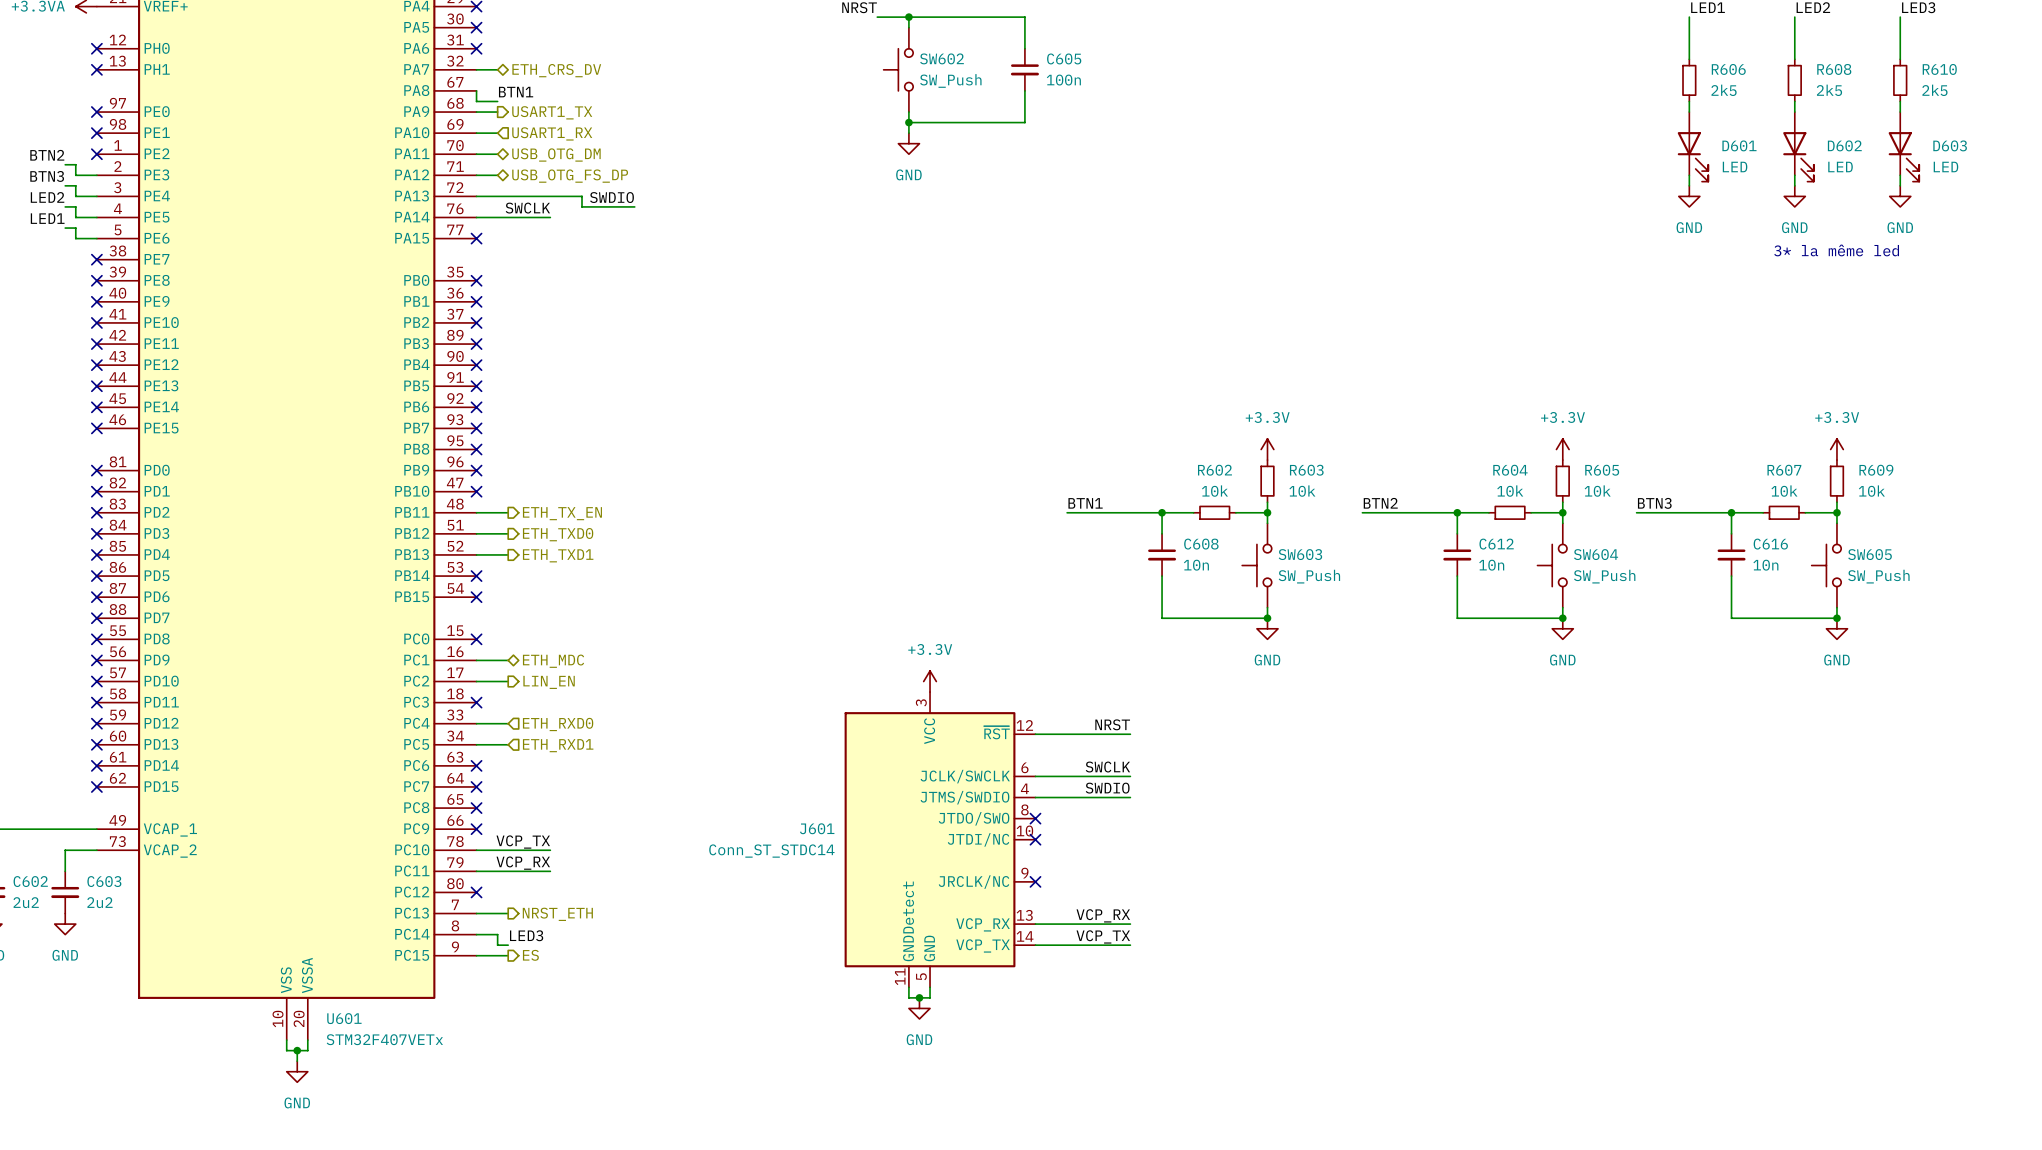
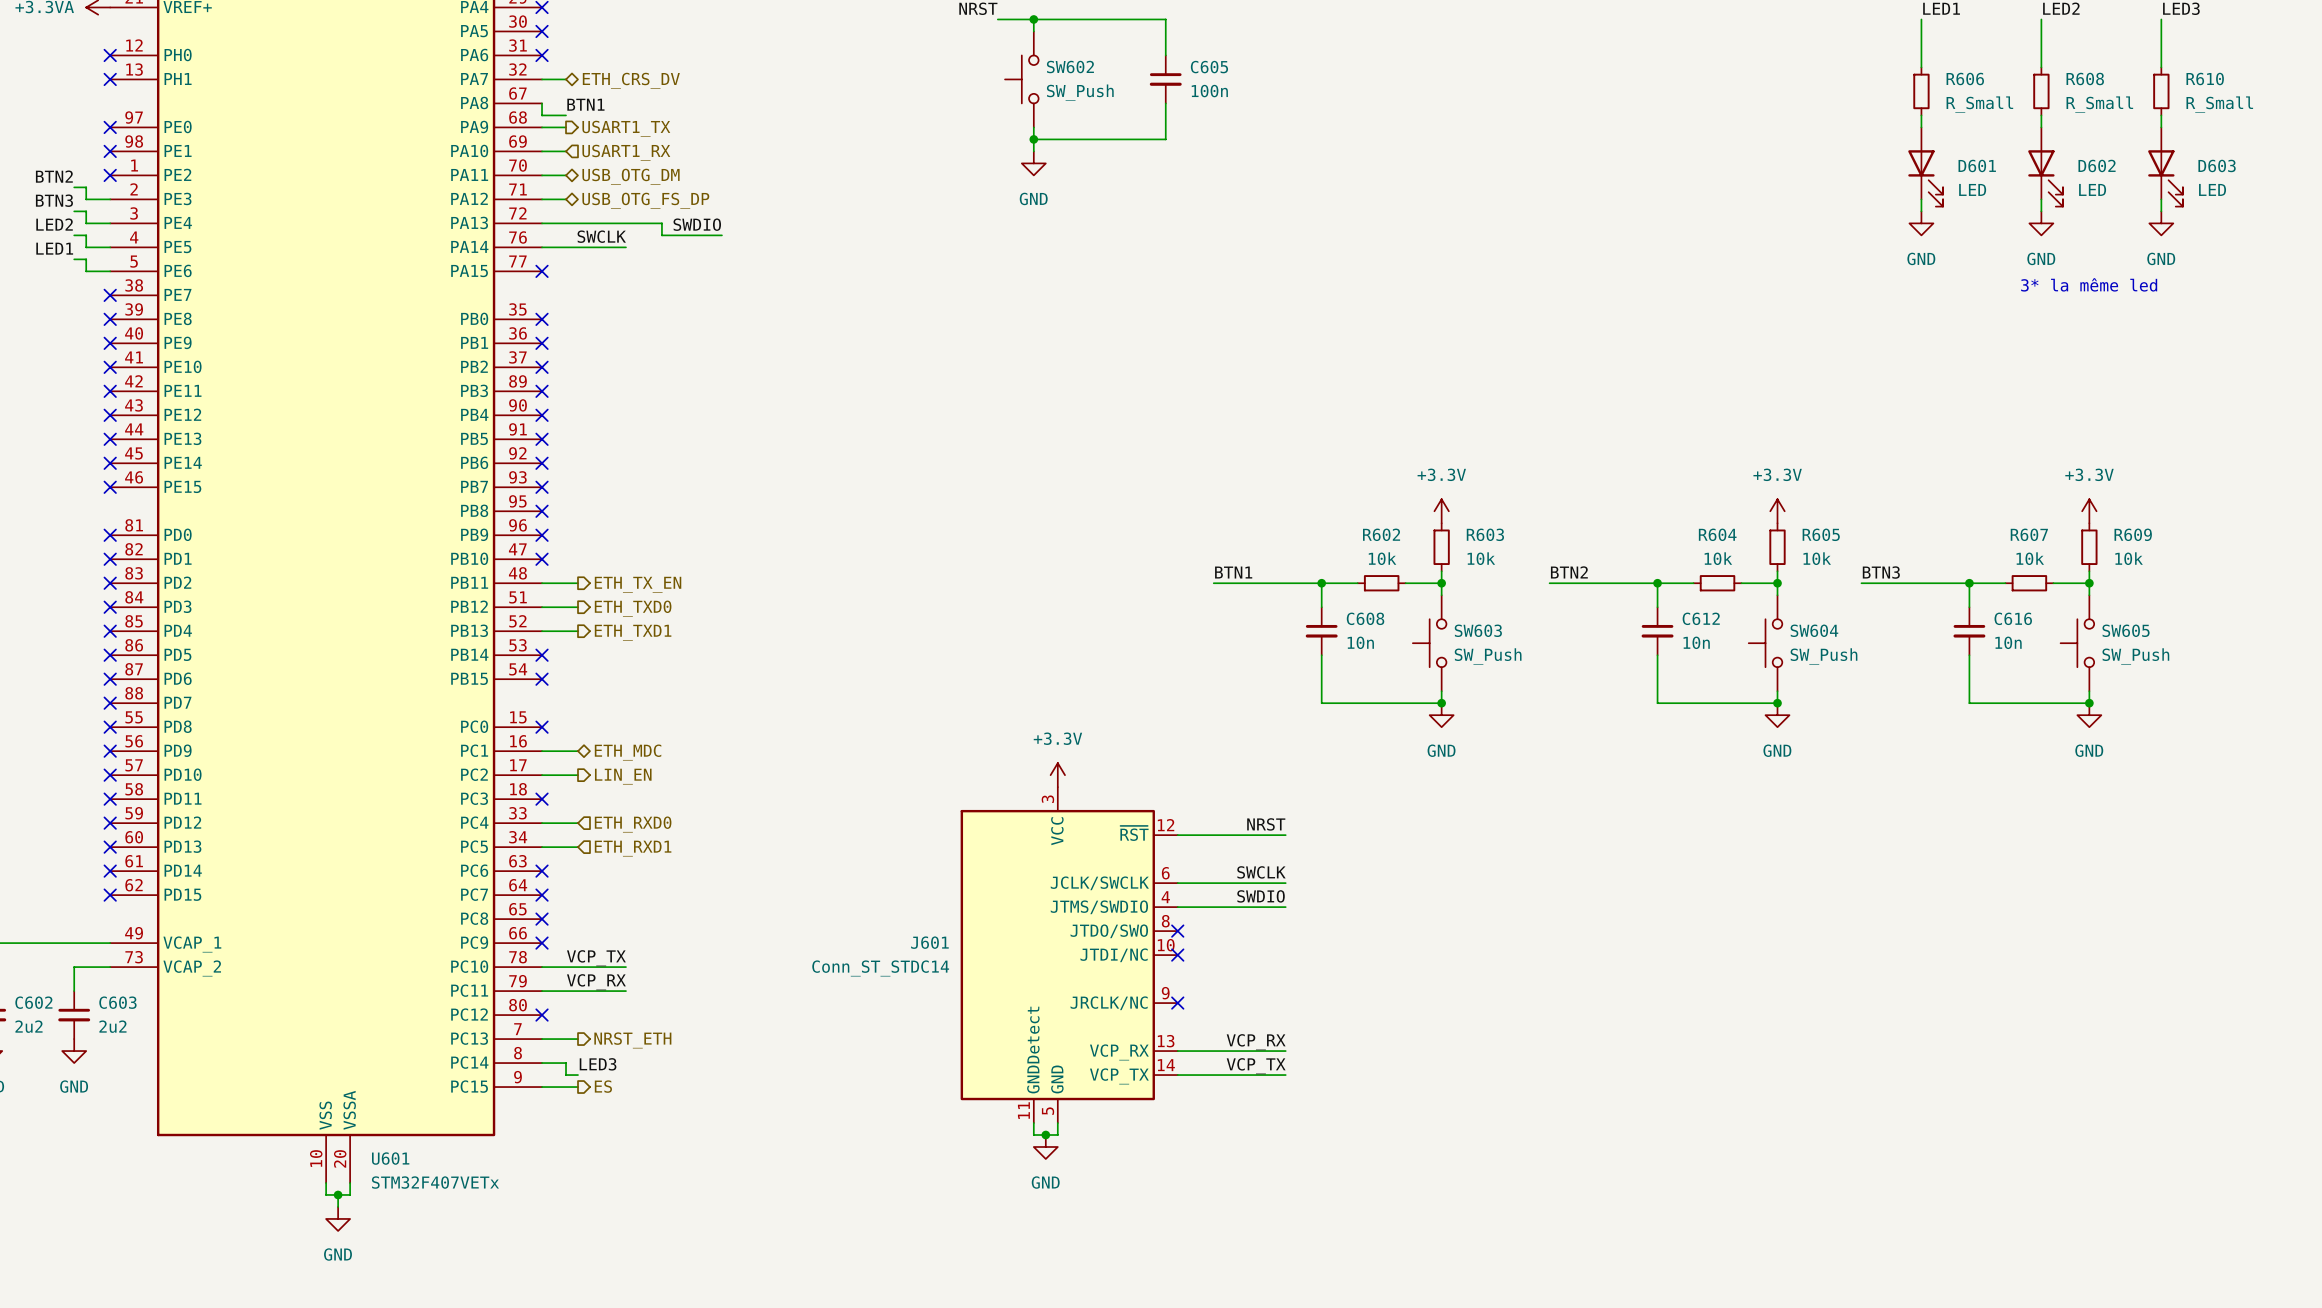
R606 value: 2k5 (1724, 90) -> R_Small (1979, 104)
R608 value: 2k5 (1829, 90) -> R_Small (2099, 104)
R610 value: 2k5 (1934, 90) -> R_Small (2219, 104)

